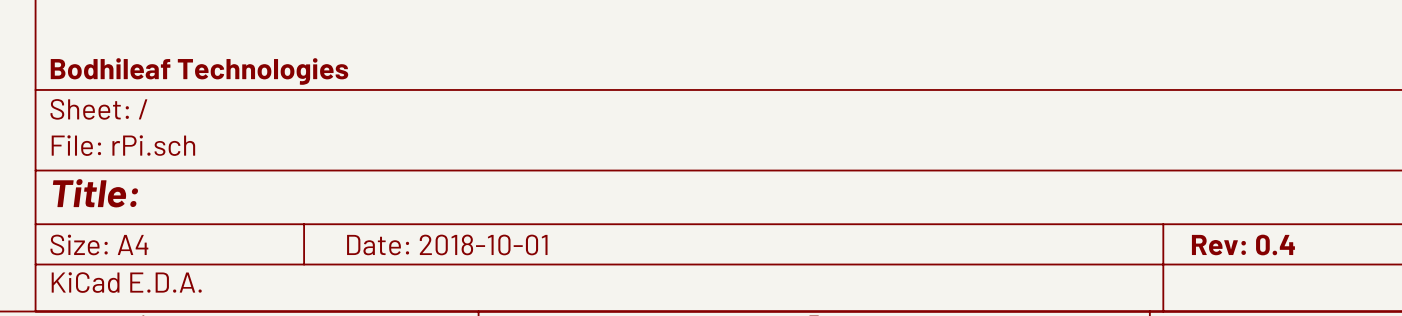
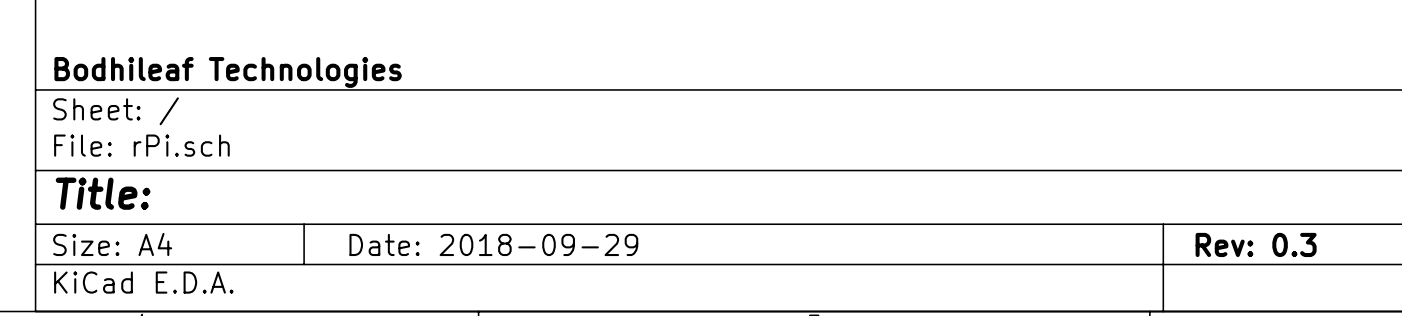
title block: Date: 2018-10-01 (447, 244) -> Date: 2018-09-29 (493, 244)
title block: Rev: 0.4 (1243, 245) -> Rev: 0.3 (1256, 244)

